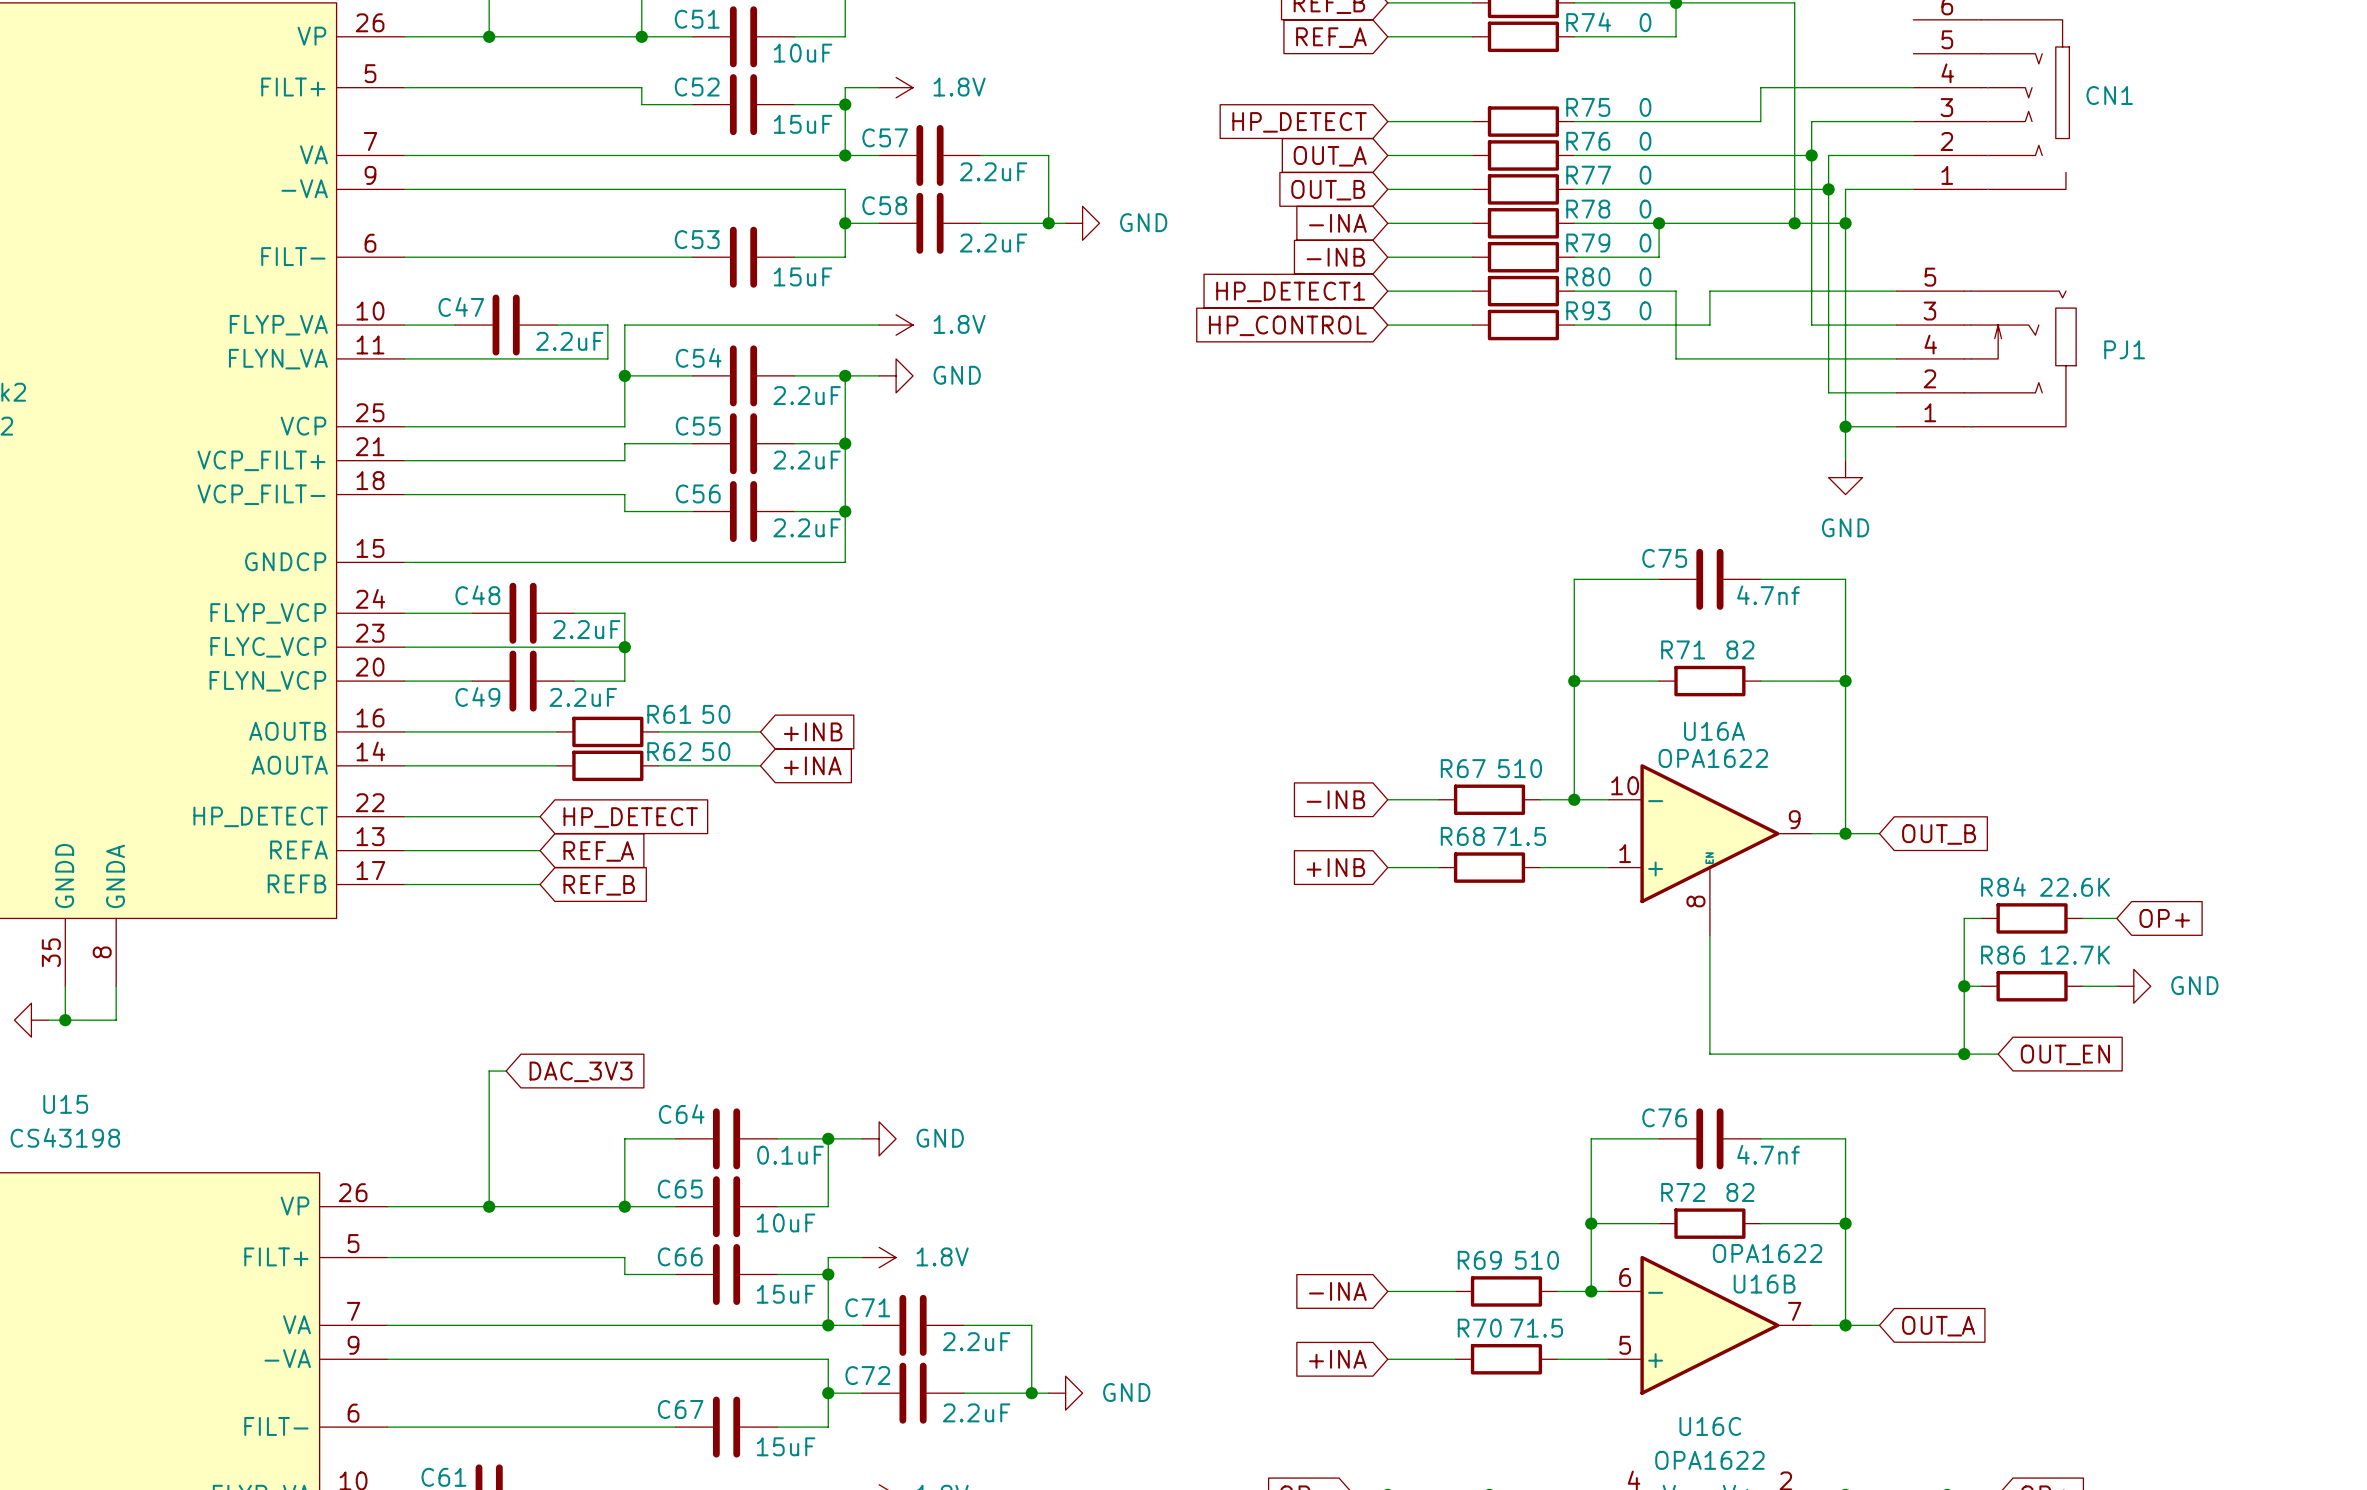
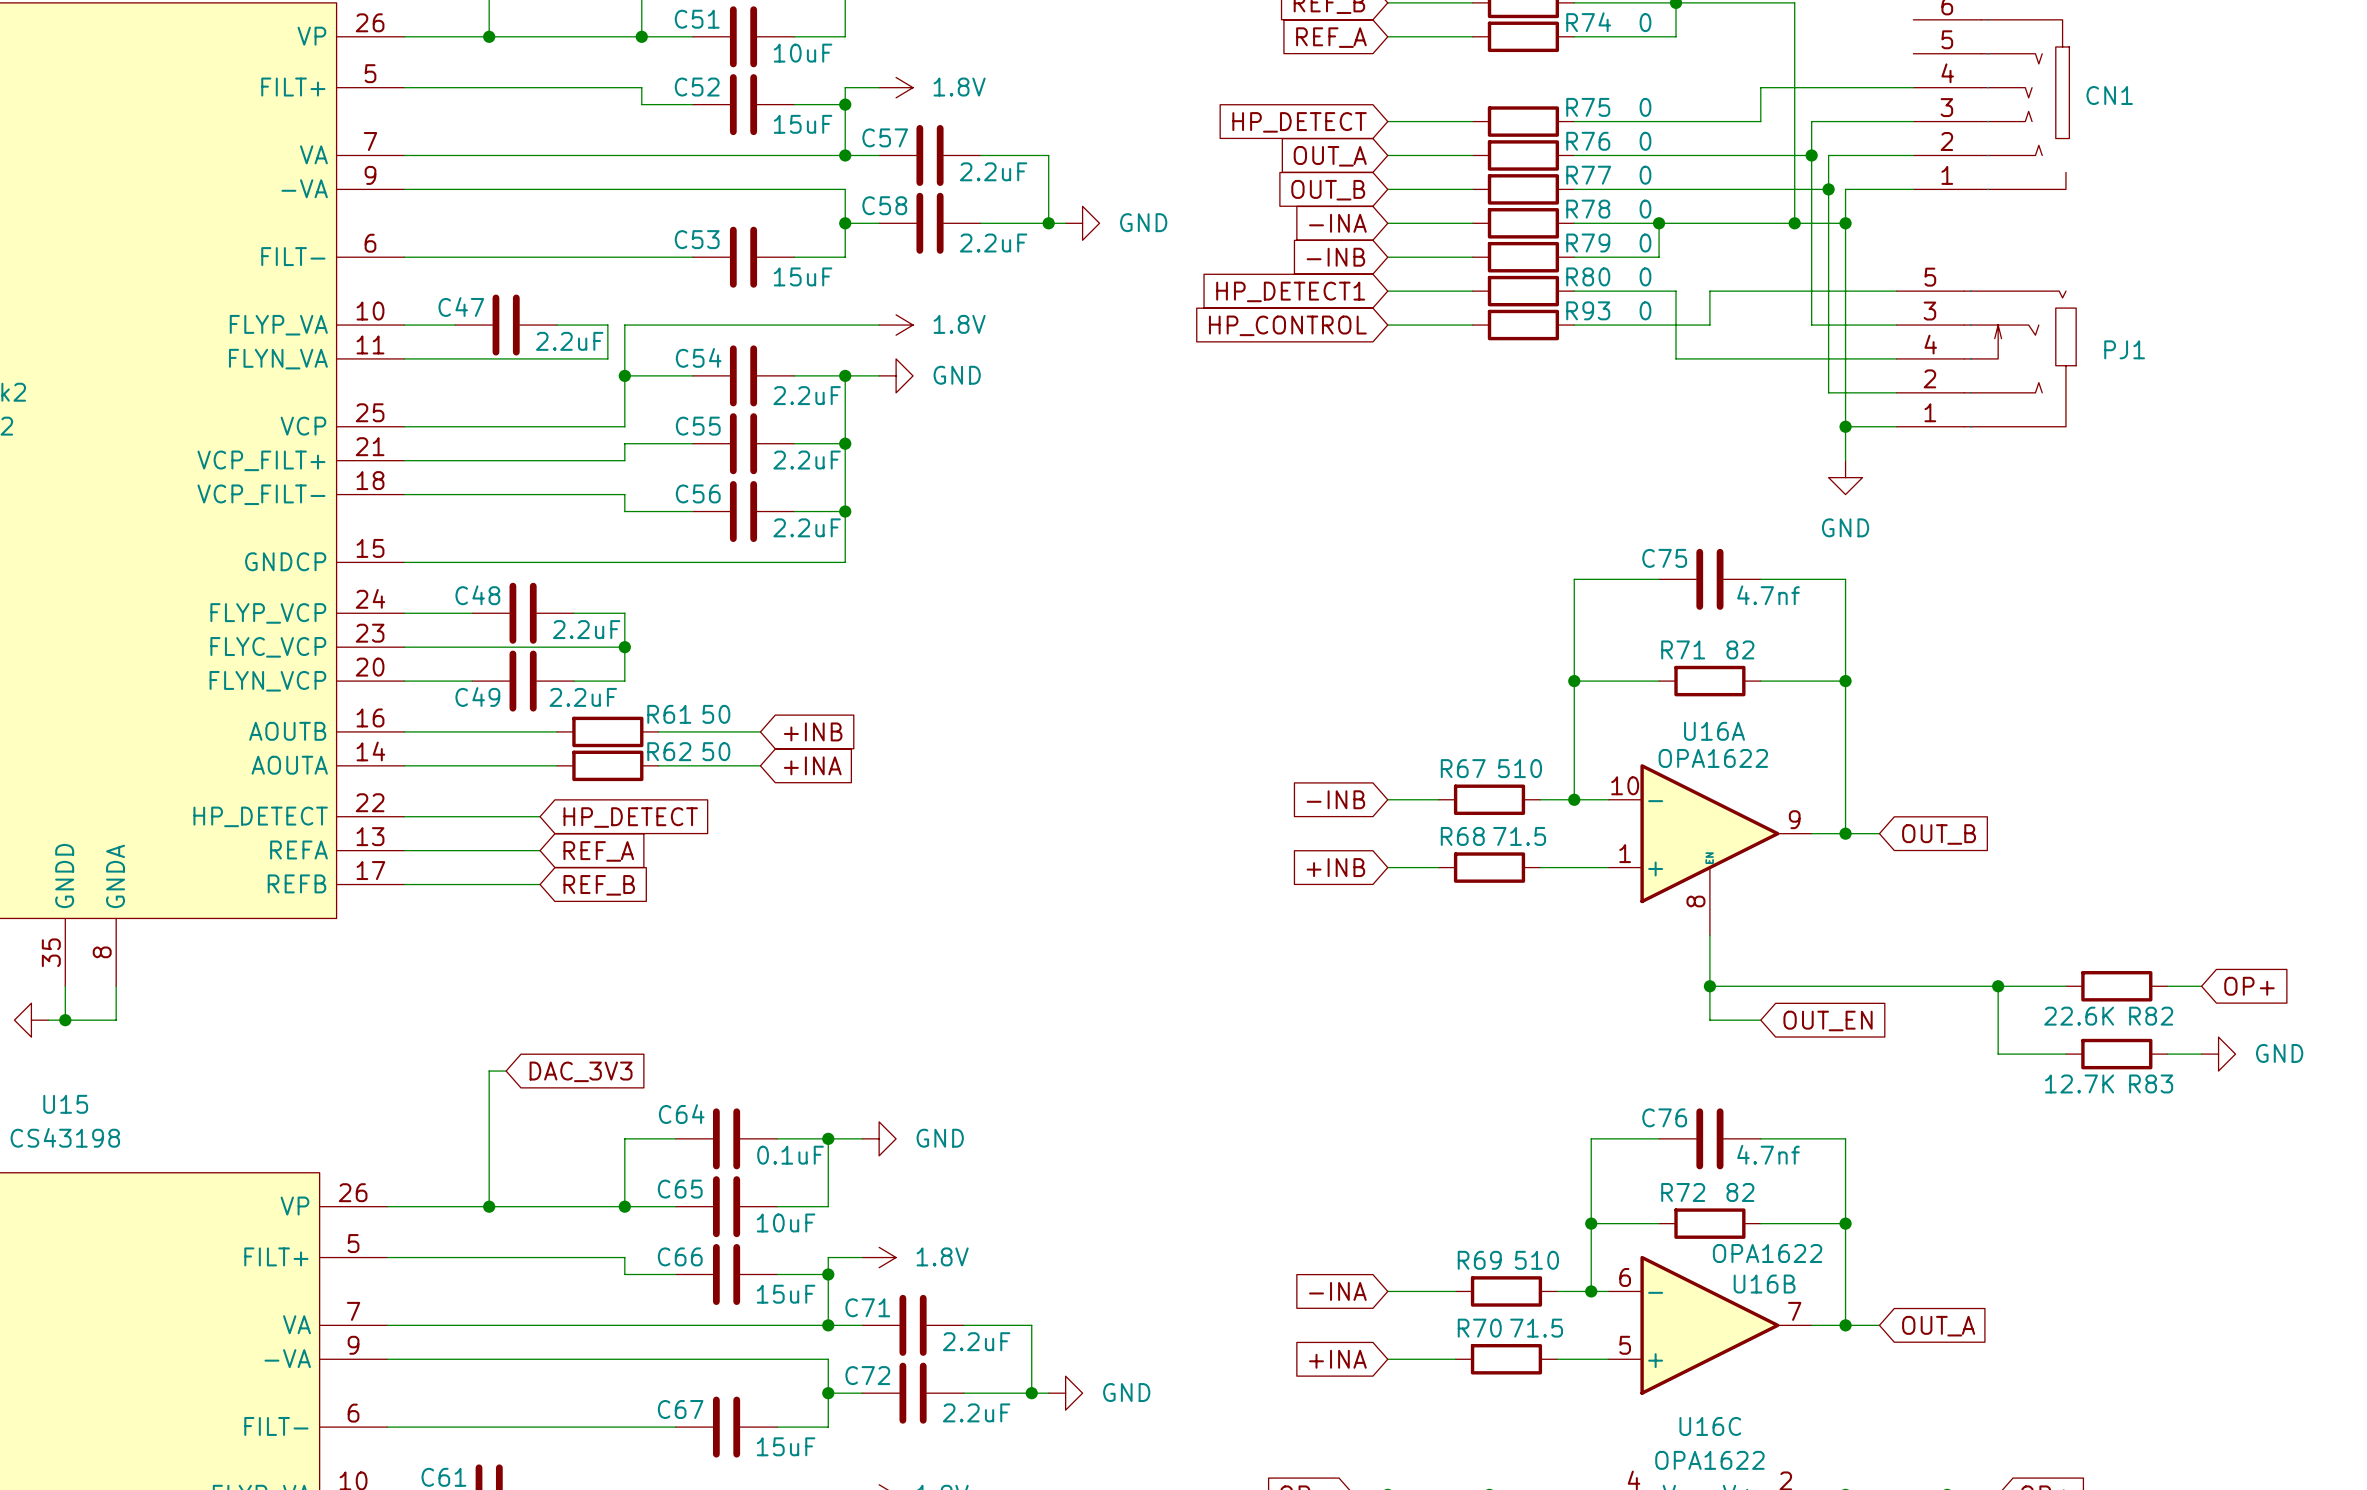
wire: (1981, 918) (1964, 918) (1964, 1054) -> none
R84: 22.6K (2032, 918) -> none
wire: (2082, 918) (2116, 918) -> (2167, 986) (2201, 986)
global label position: OP+ (2164, 918) -> OP+ (2249, 986)
wire: none -> (1709, 986) (1964, 986)
junction: none -> (1709, 986)
junction position: (1964, 986) -> (1998, 986)
wire: none -> (1981, 986) (2065, 986)
wire: none -> (1998, 986) (1998, 1054) (2065, 1054)
R86: 12.7K (2032, 986) -> none
wire: (2082, 986) (2116, 986) -> (2167, 1054) (2201, 1054)
R82: none -> 22.6K (2116, 986)
power symbol position: GND (2133, 986) -> GND (2218, 1054)
wire: (1709, 1020) (1709, 1054) (1998, 1054) -> (1709, 1020) (1760, 1020)
junction: (1964, 1054) -> none
global label position: OUT_EN (2065, 1054) -> OUT_EN (1828, 1020)
R83: none -> 12.7K (2116, 1054)

